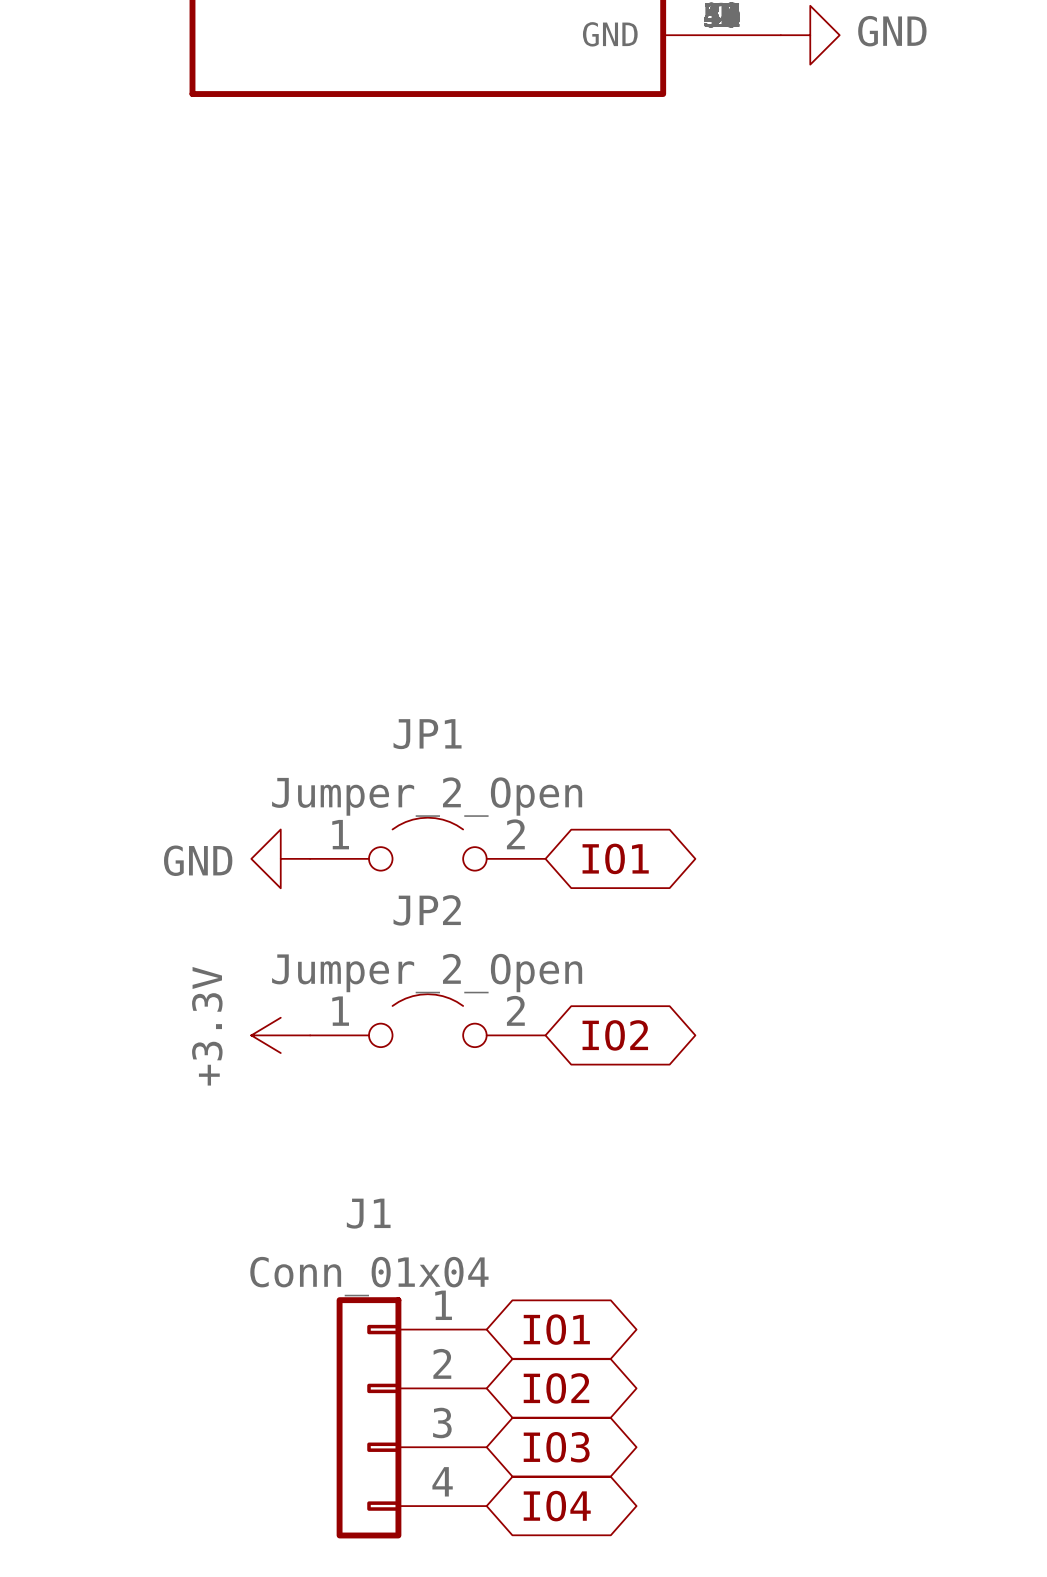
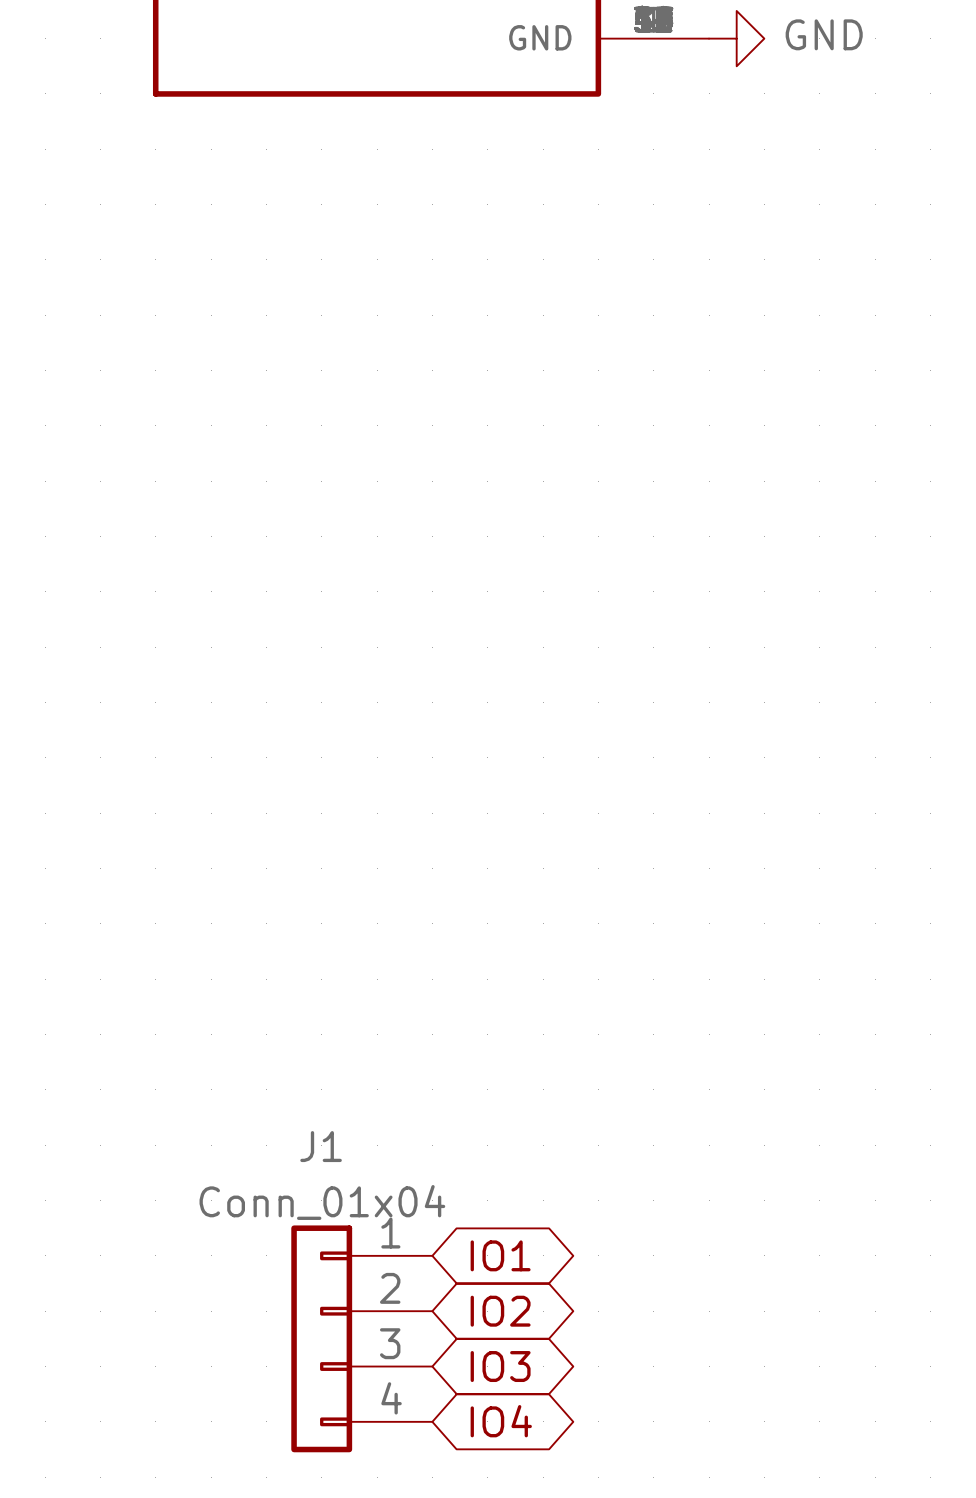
JP1: Jumper_2_Open (427, 844) -> none
power symbol: GND (280, 858) -> none
global label: IO1 (615, 858) -> none
JP2: Jumper_2_Open (427, 1020) -> none
power symbol: +3.3V (280, 1035) -> none
global label: IO2 (615, 1035) -> none

